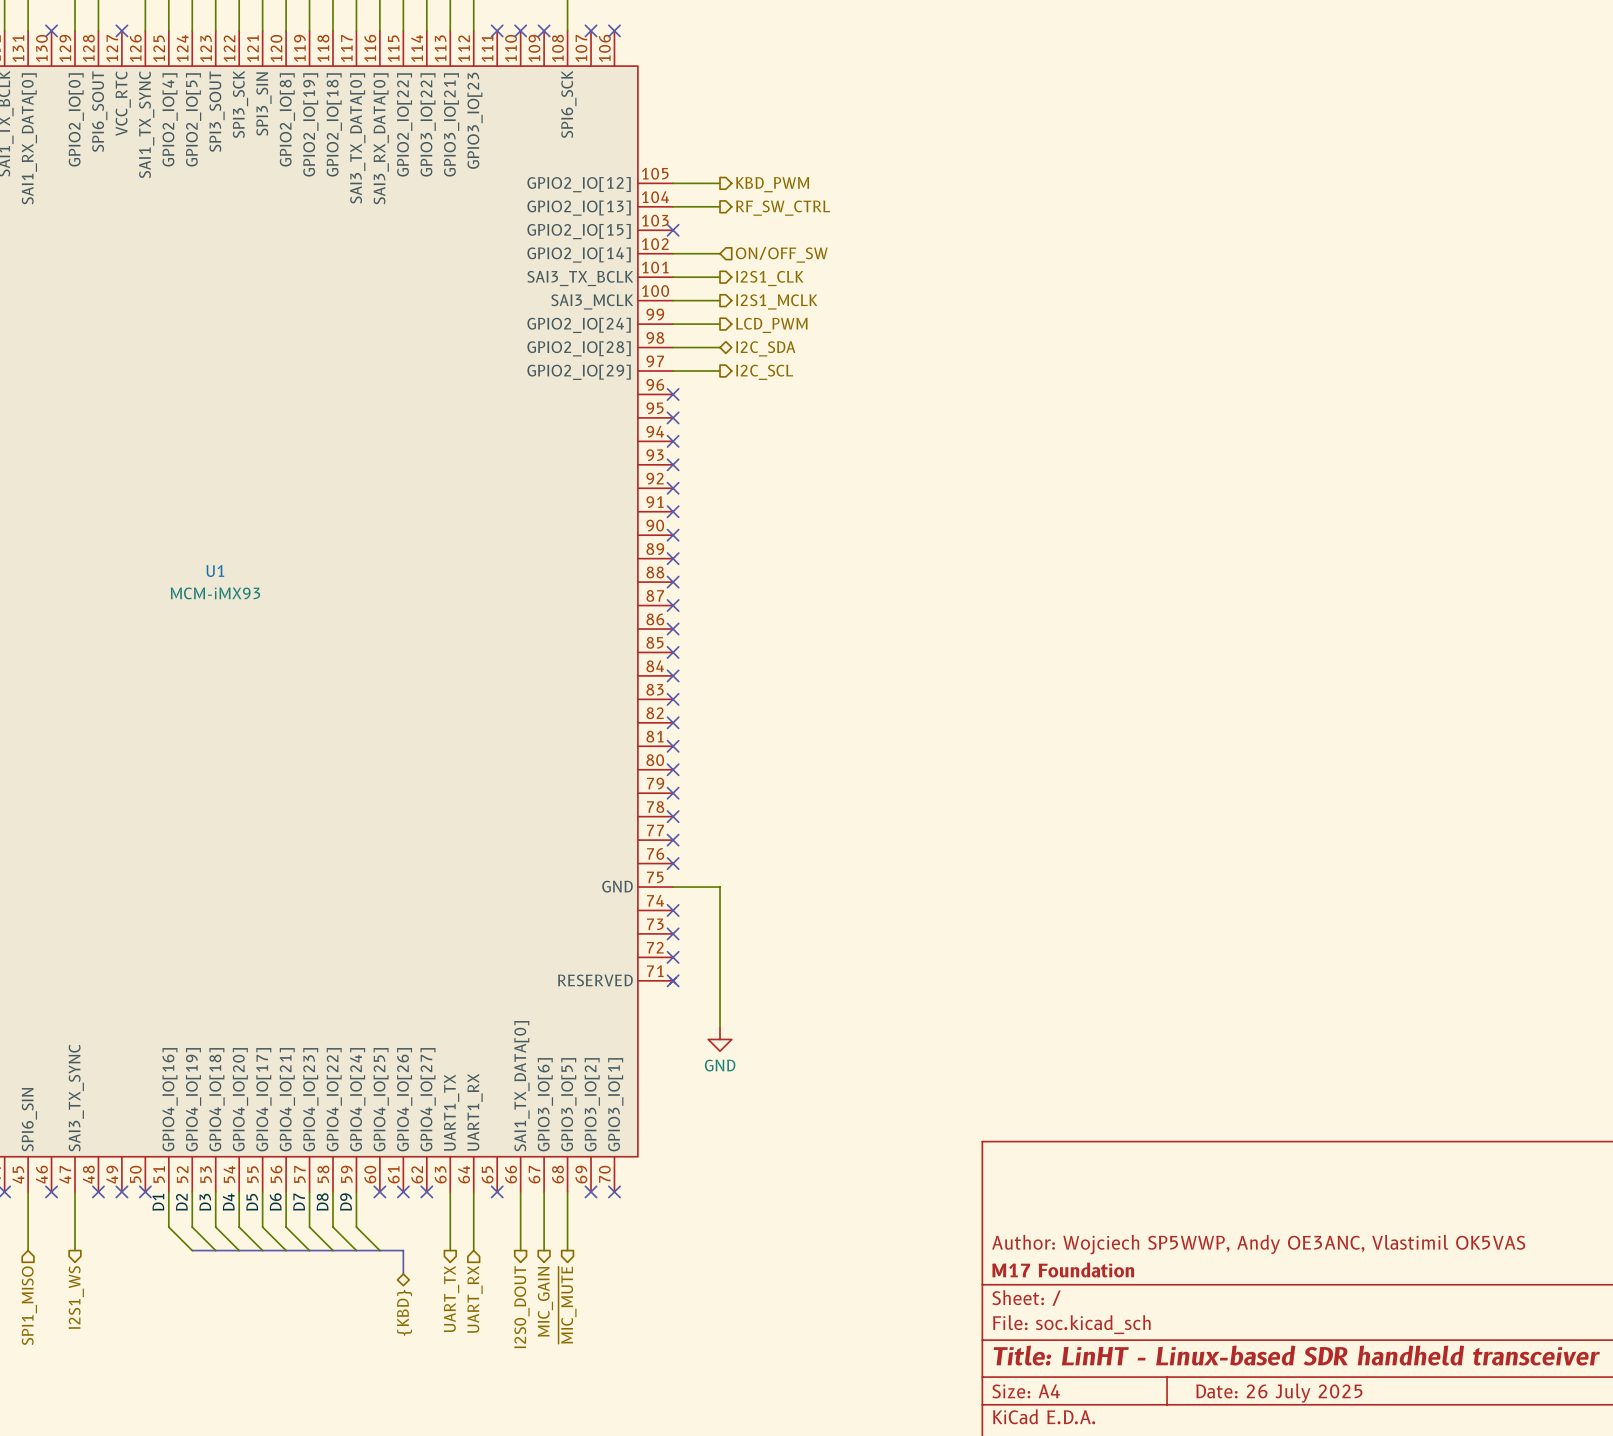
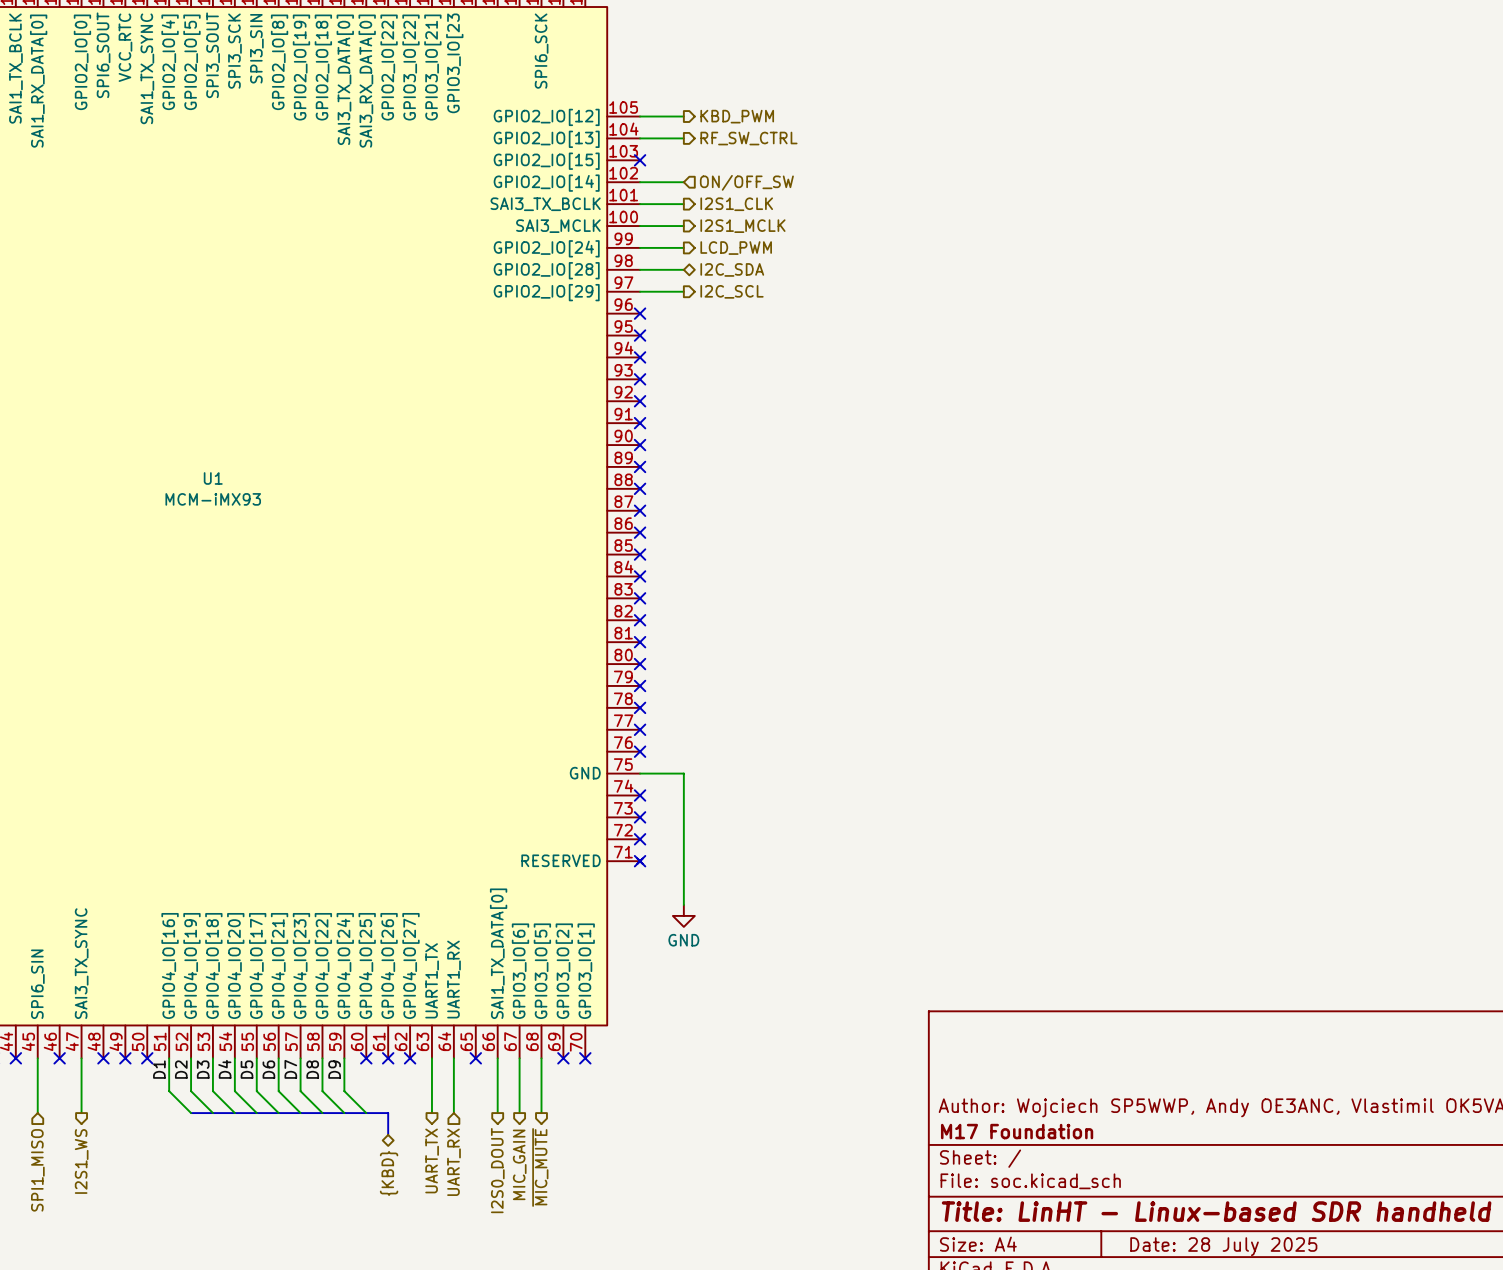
title block: Date: 26 July 2025 (1279, 1393) -> Date: 28 July 2025 (1223, 1246)

